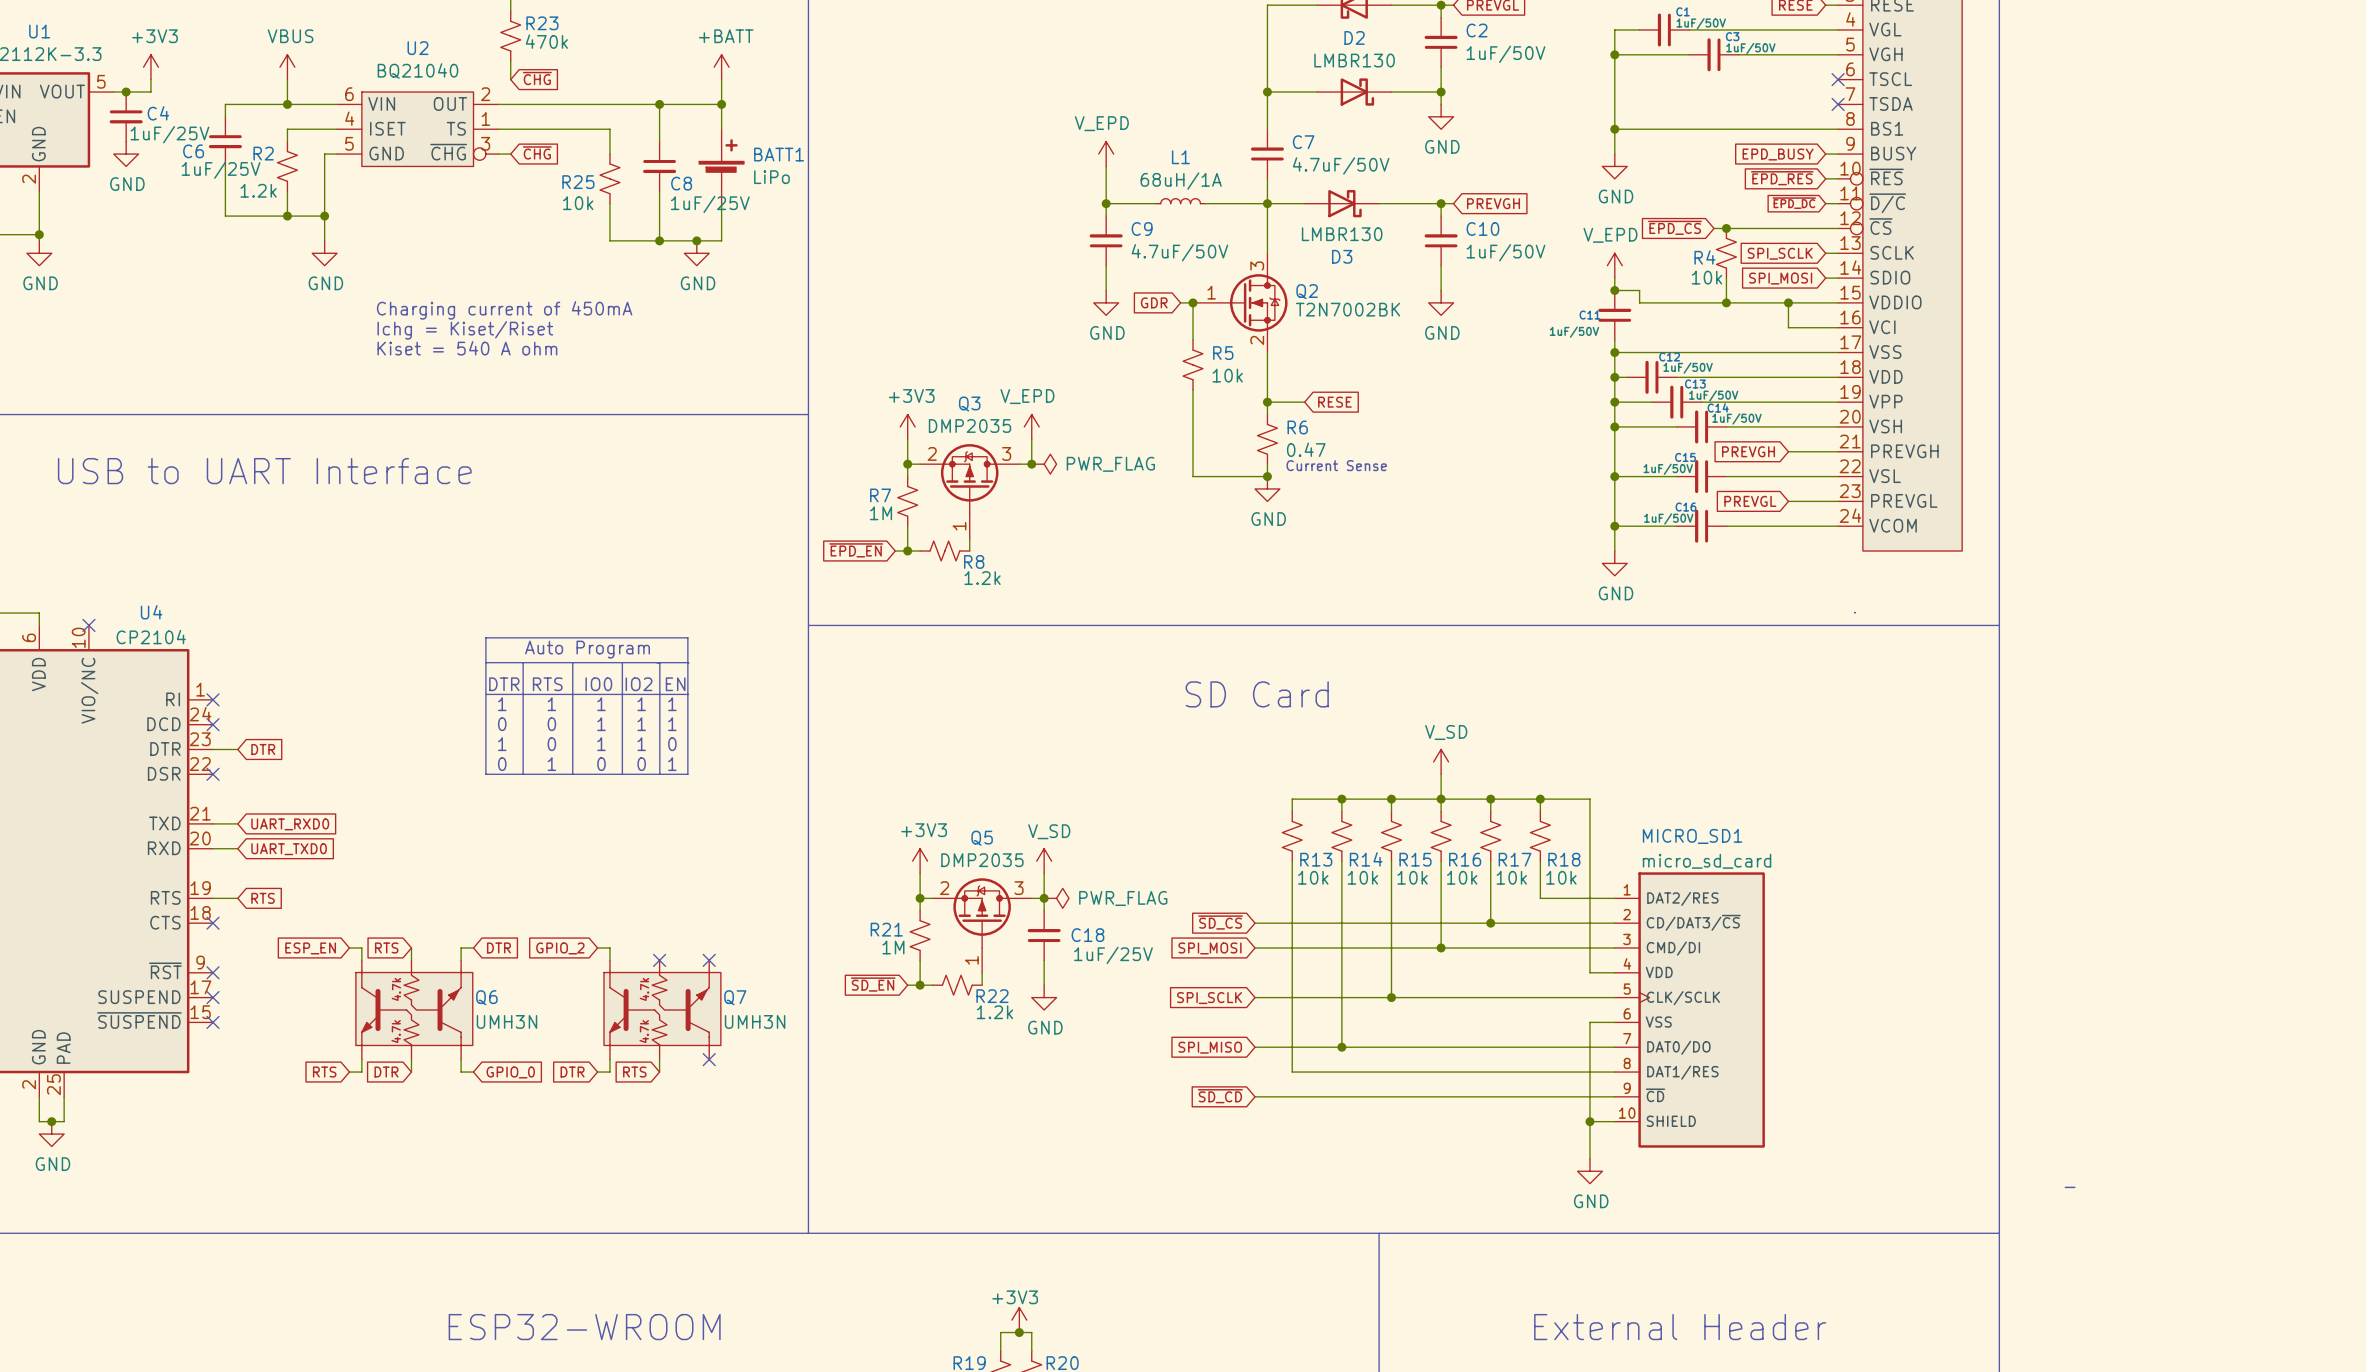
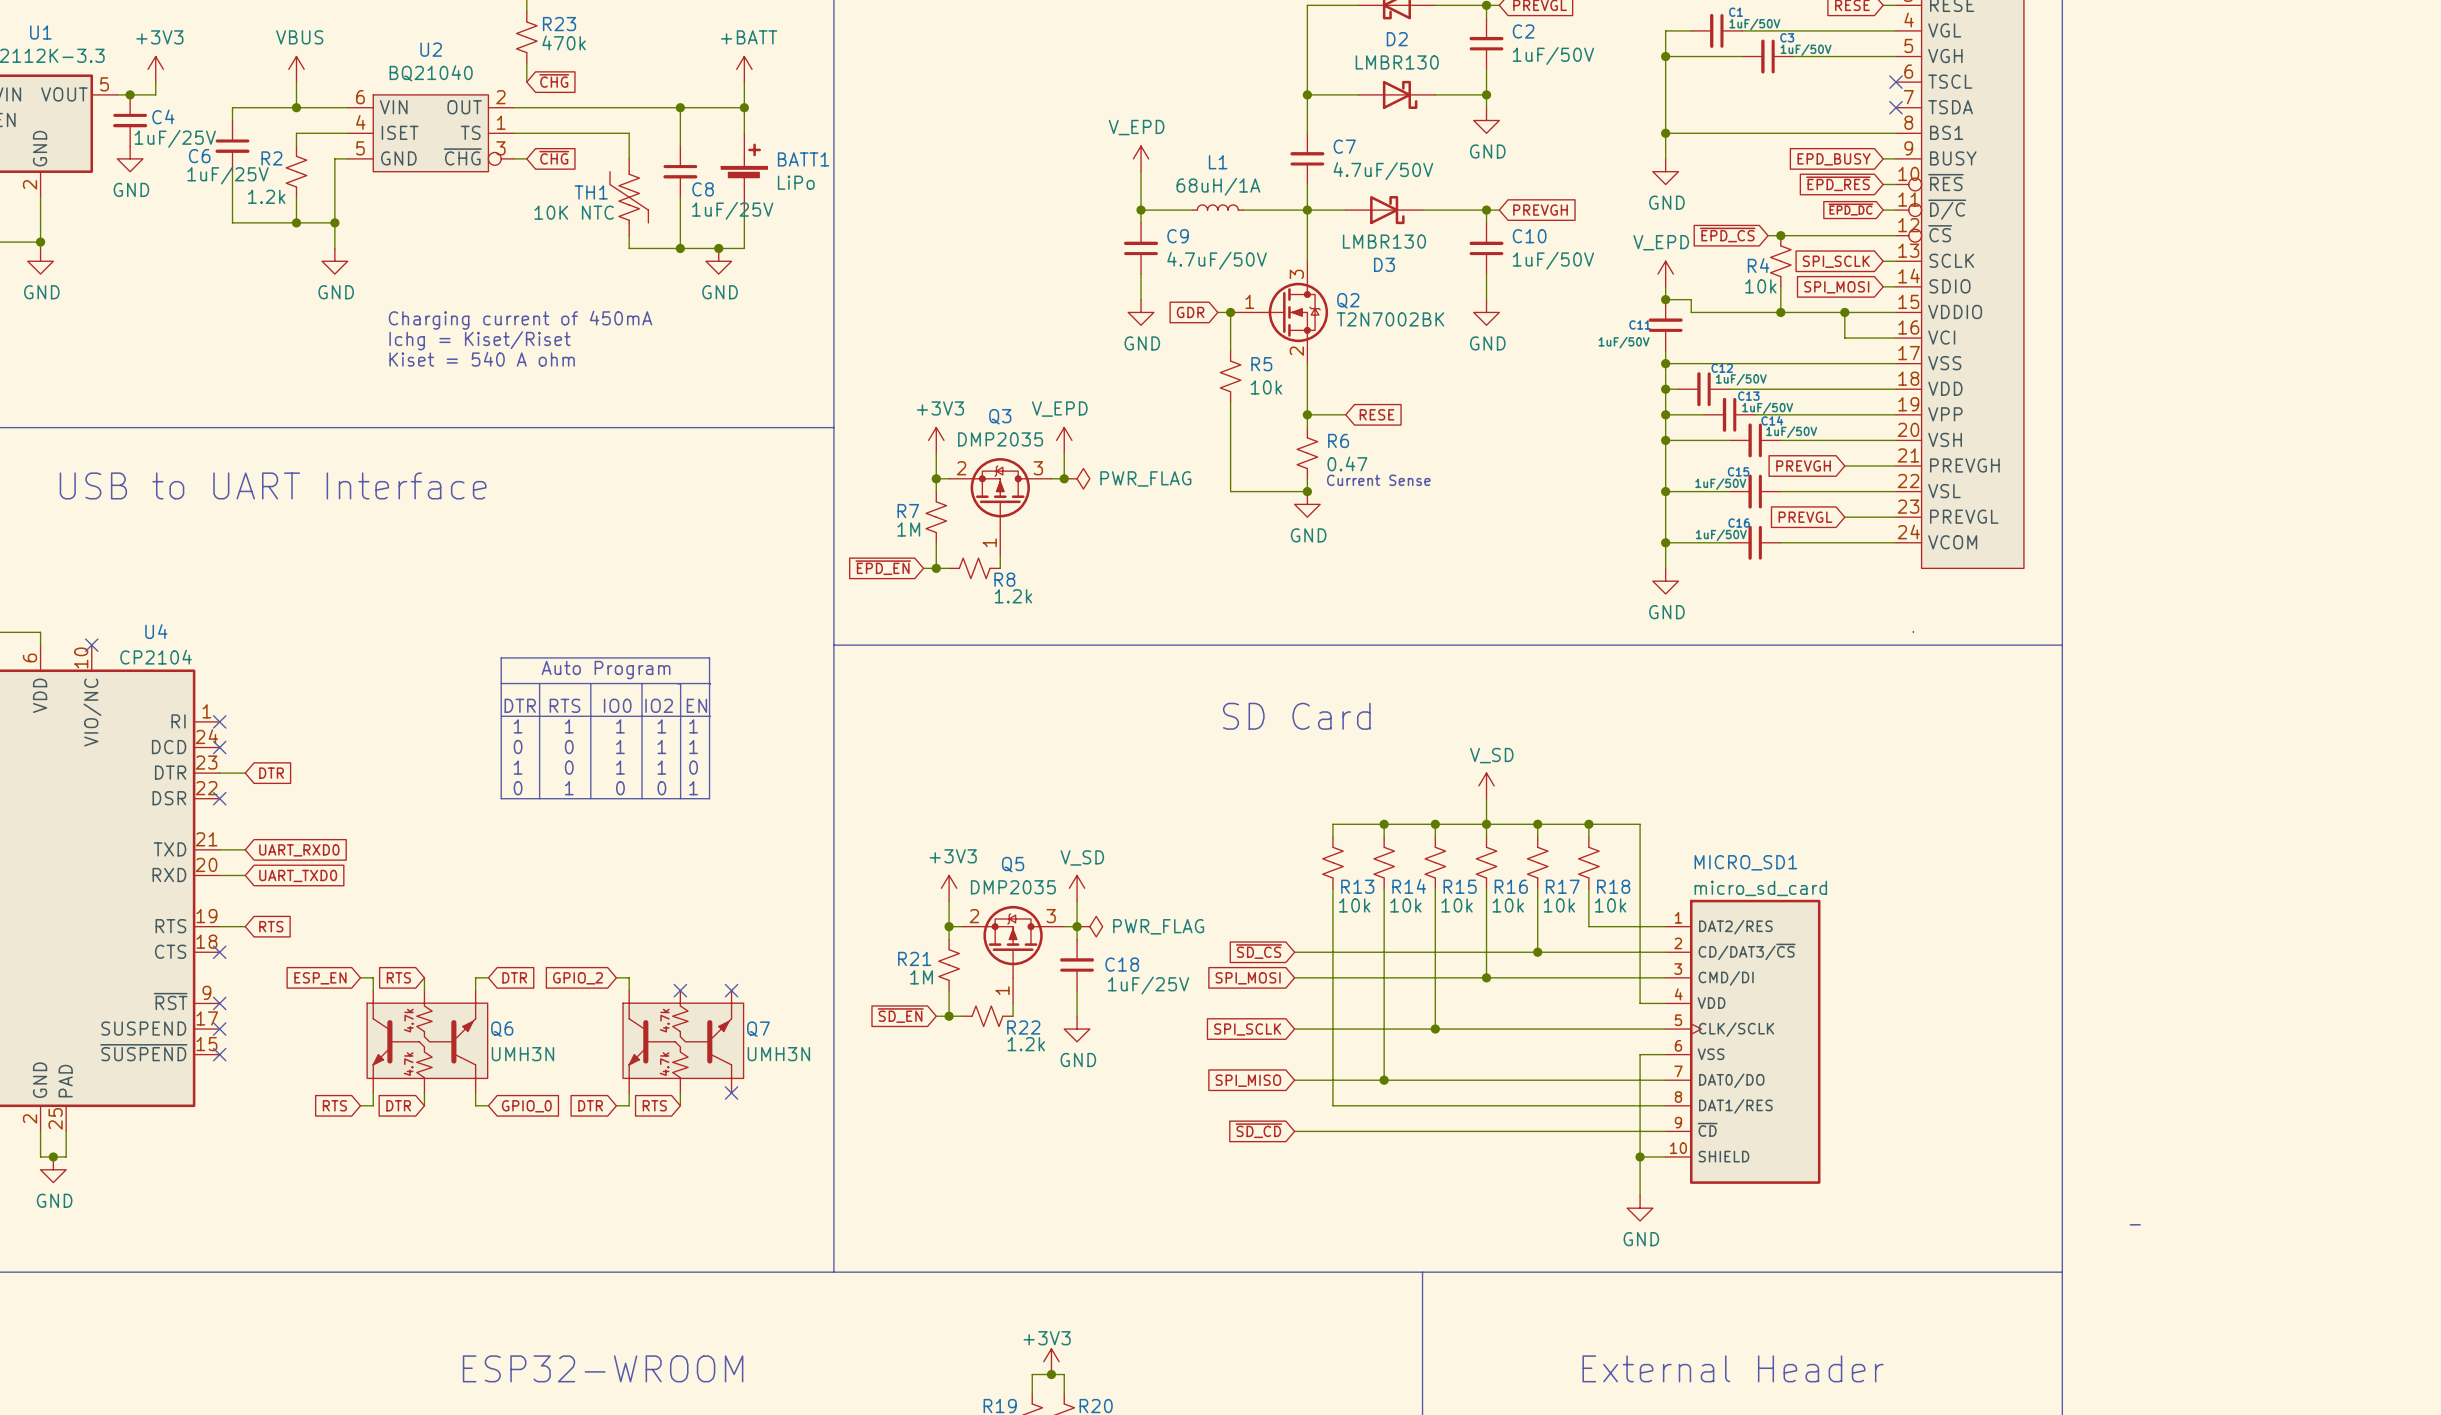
R25: 10k (609, 178) -> none
TH1: none -> 10K NTC (629, 197)

